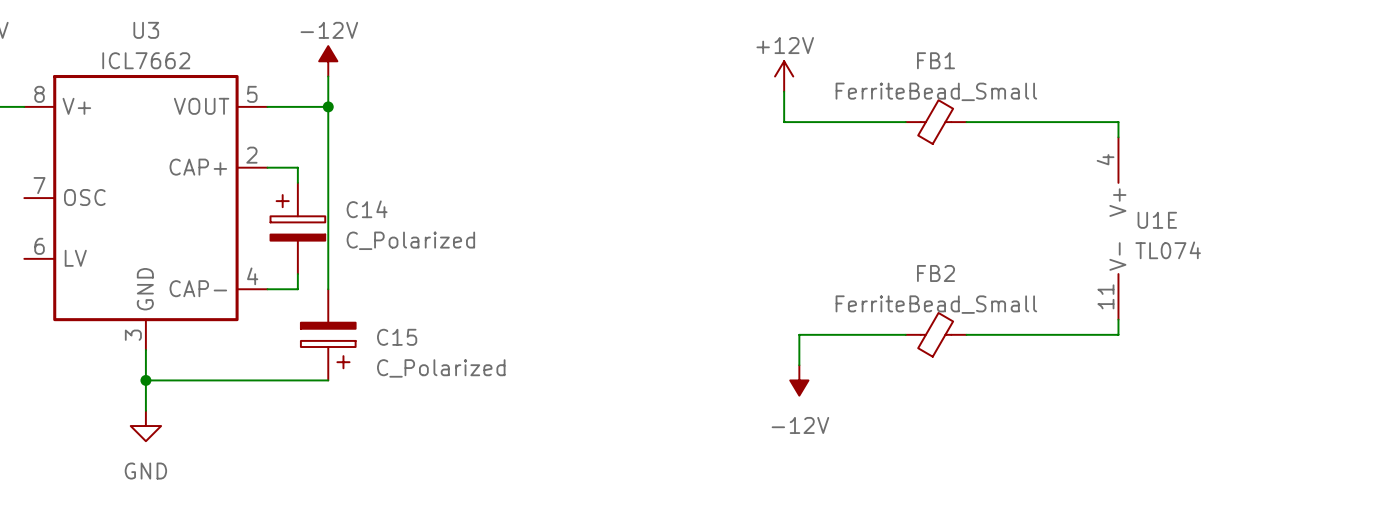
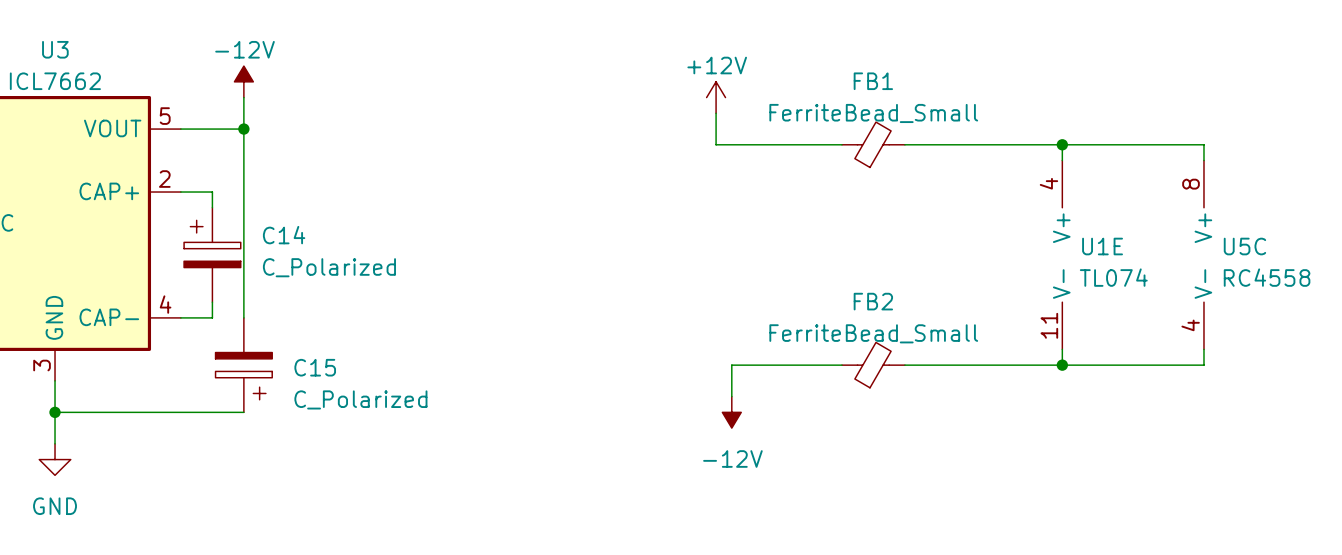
wire: none -> (1062, 144) (1203, 144) (1203, 160)
junction: none -> (1062, 144)
U5C: none -> RC4558 (1203, 254)
wire: none -> (1203, 349) (1203, 365) (1062, 365)
junction: none -> (1062, 365)

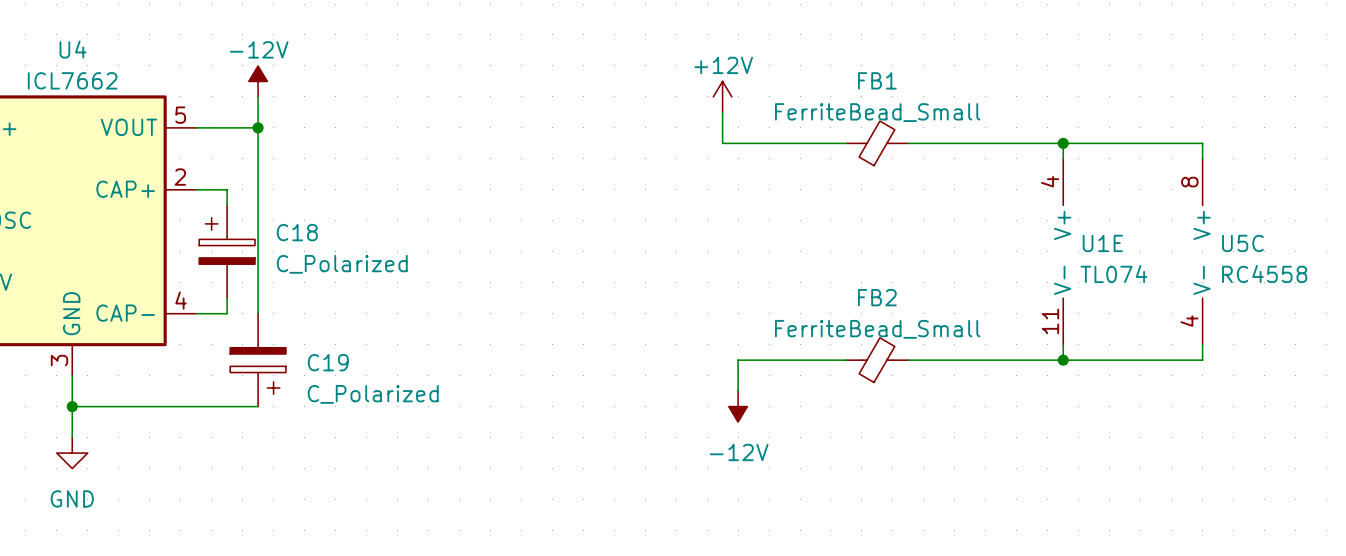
U3 name: U3 (55, 49) -> U4 (73, 49)
C14 name: C14 (284, 235) -> C18 (297, 232)
C15 name: C15 (315, 367) -> C19 (328, 362)

